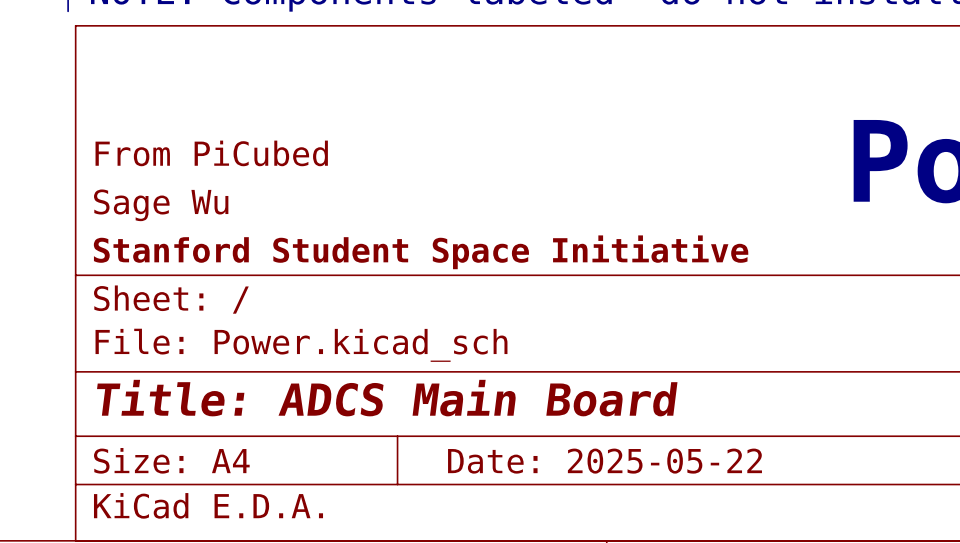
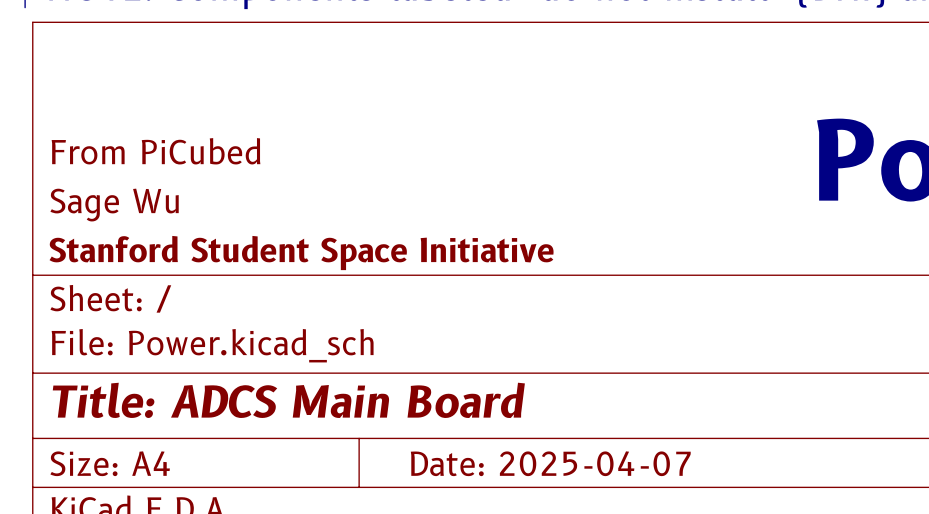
title block: Date: 2025-05-22 (605, 461) -> Date: 2025-04-07 (550, 463)

